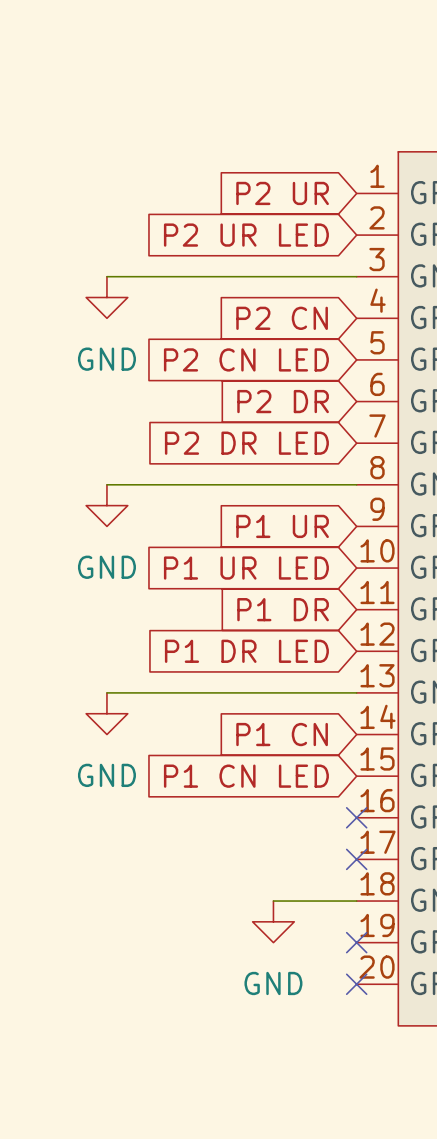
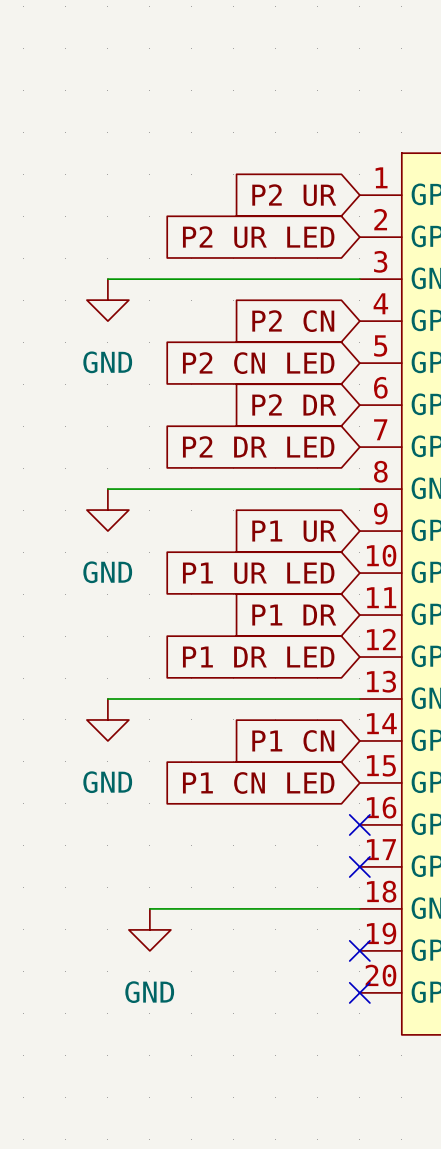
wire: none -> (149, 908) (275, 908)
power symbol position: GND (273, 921) -> GND (149, 929)

